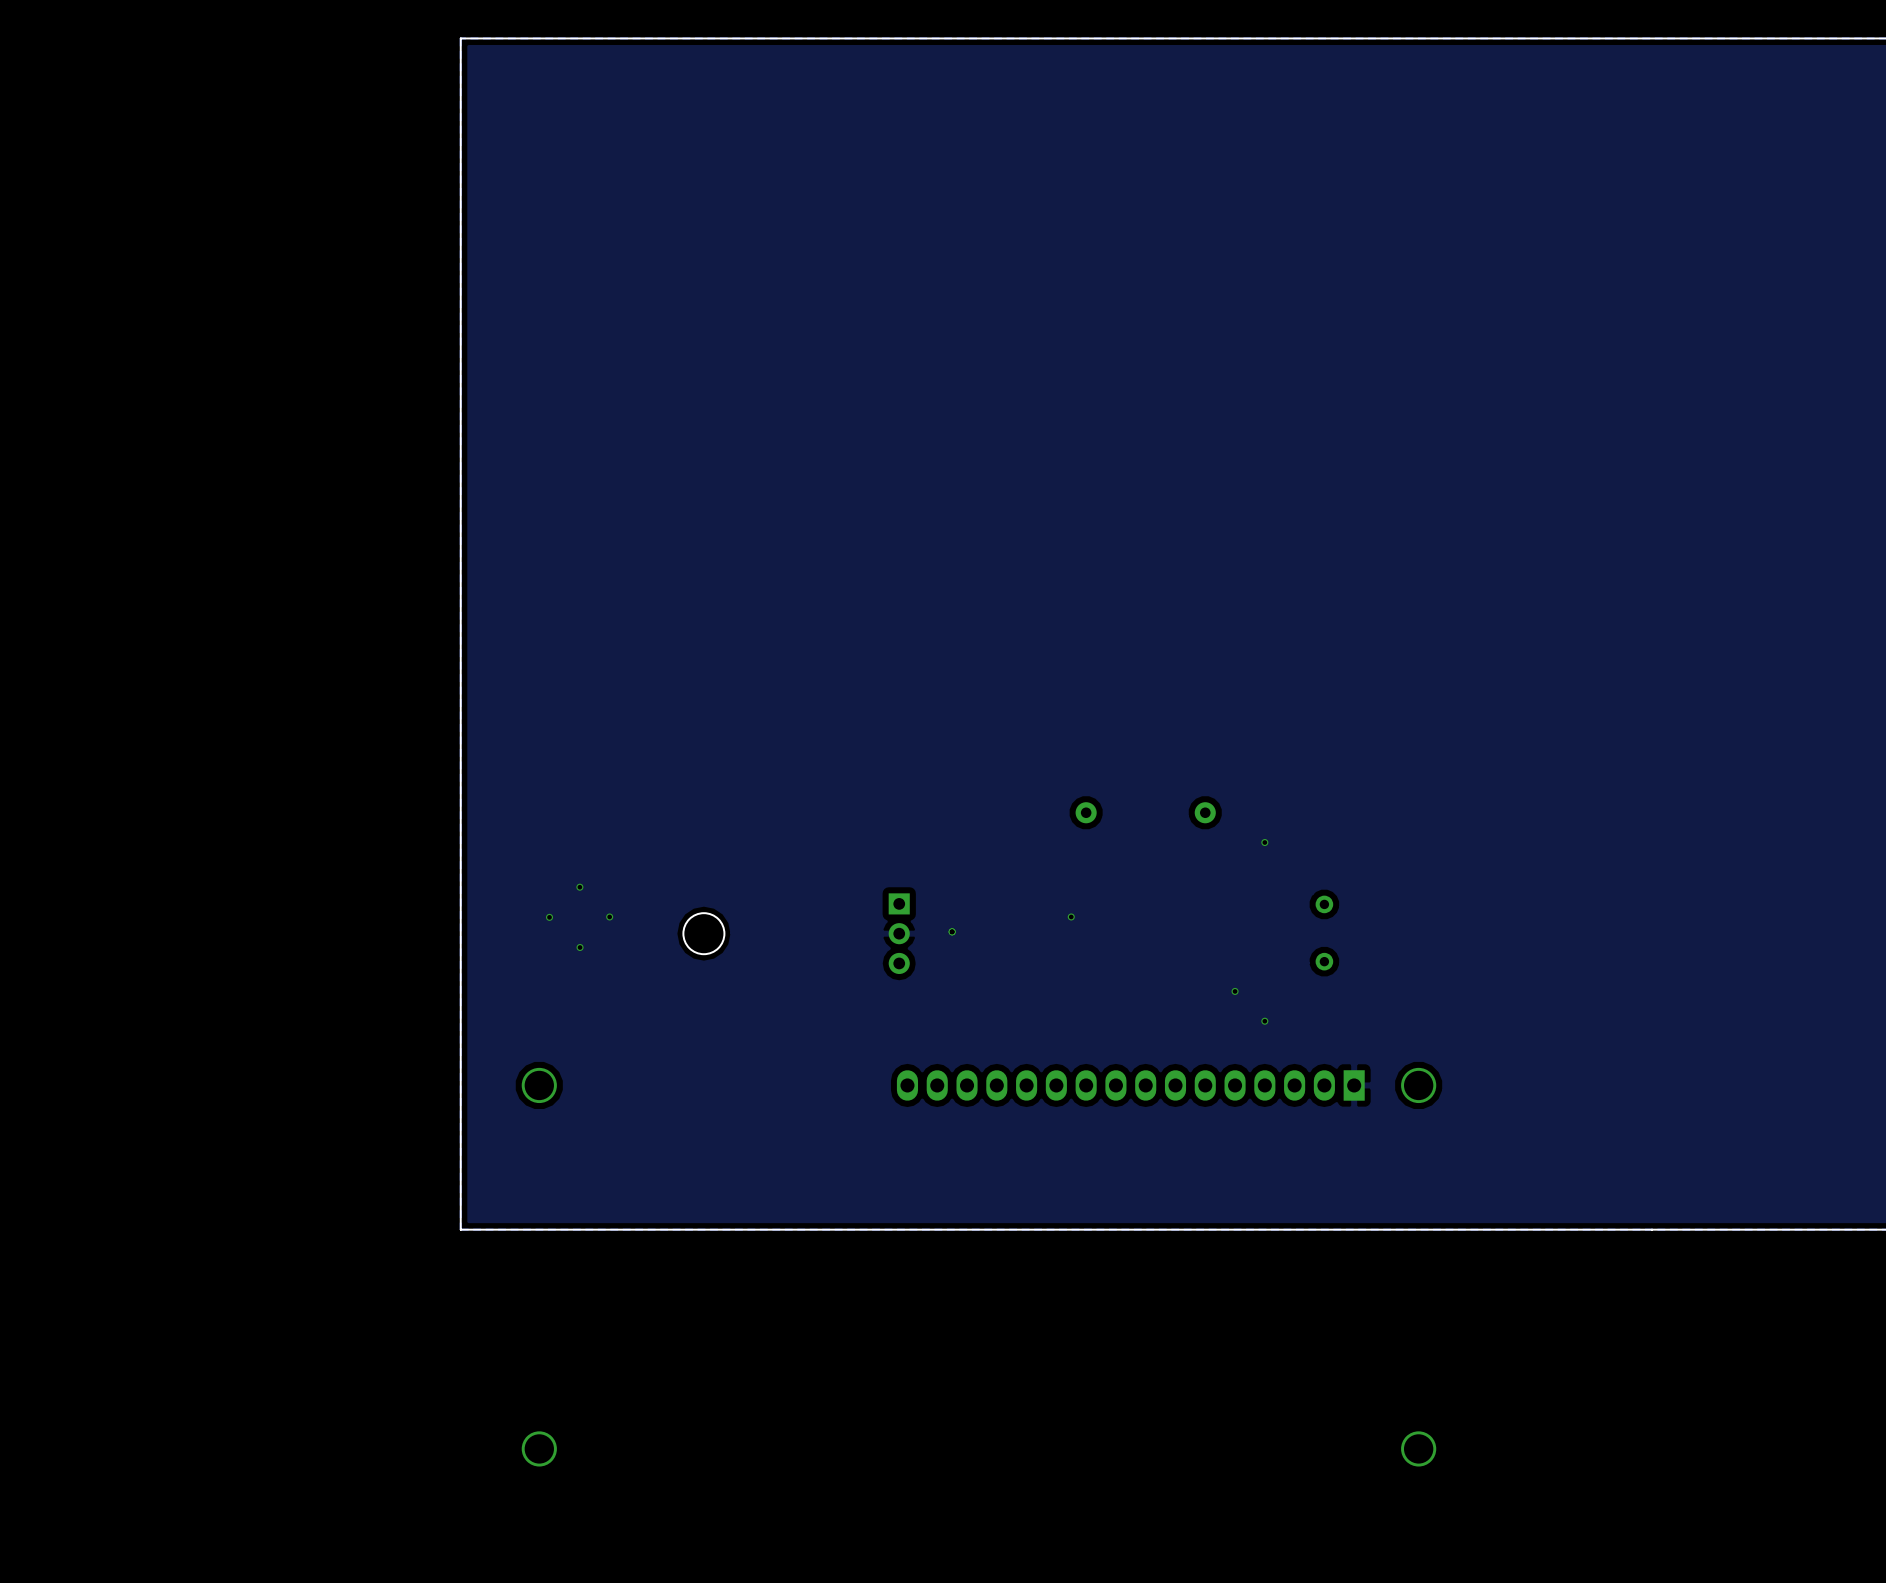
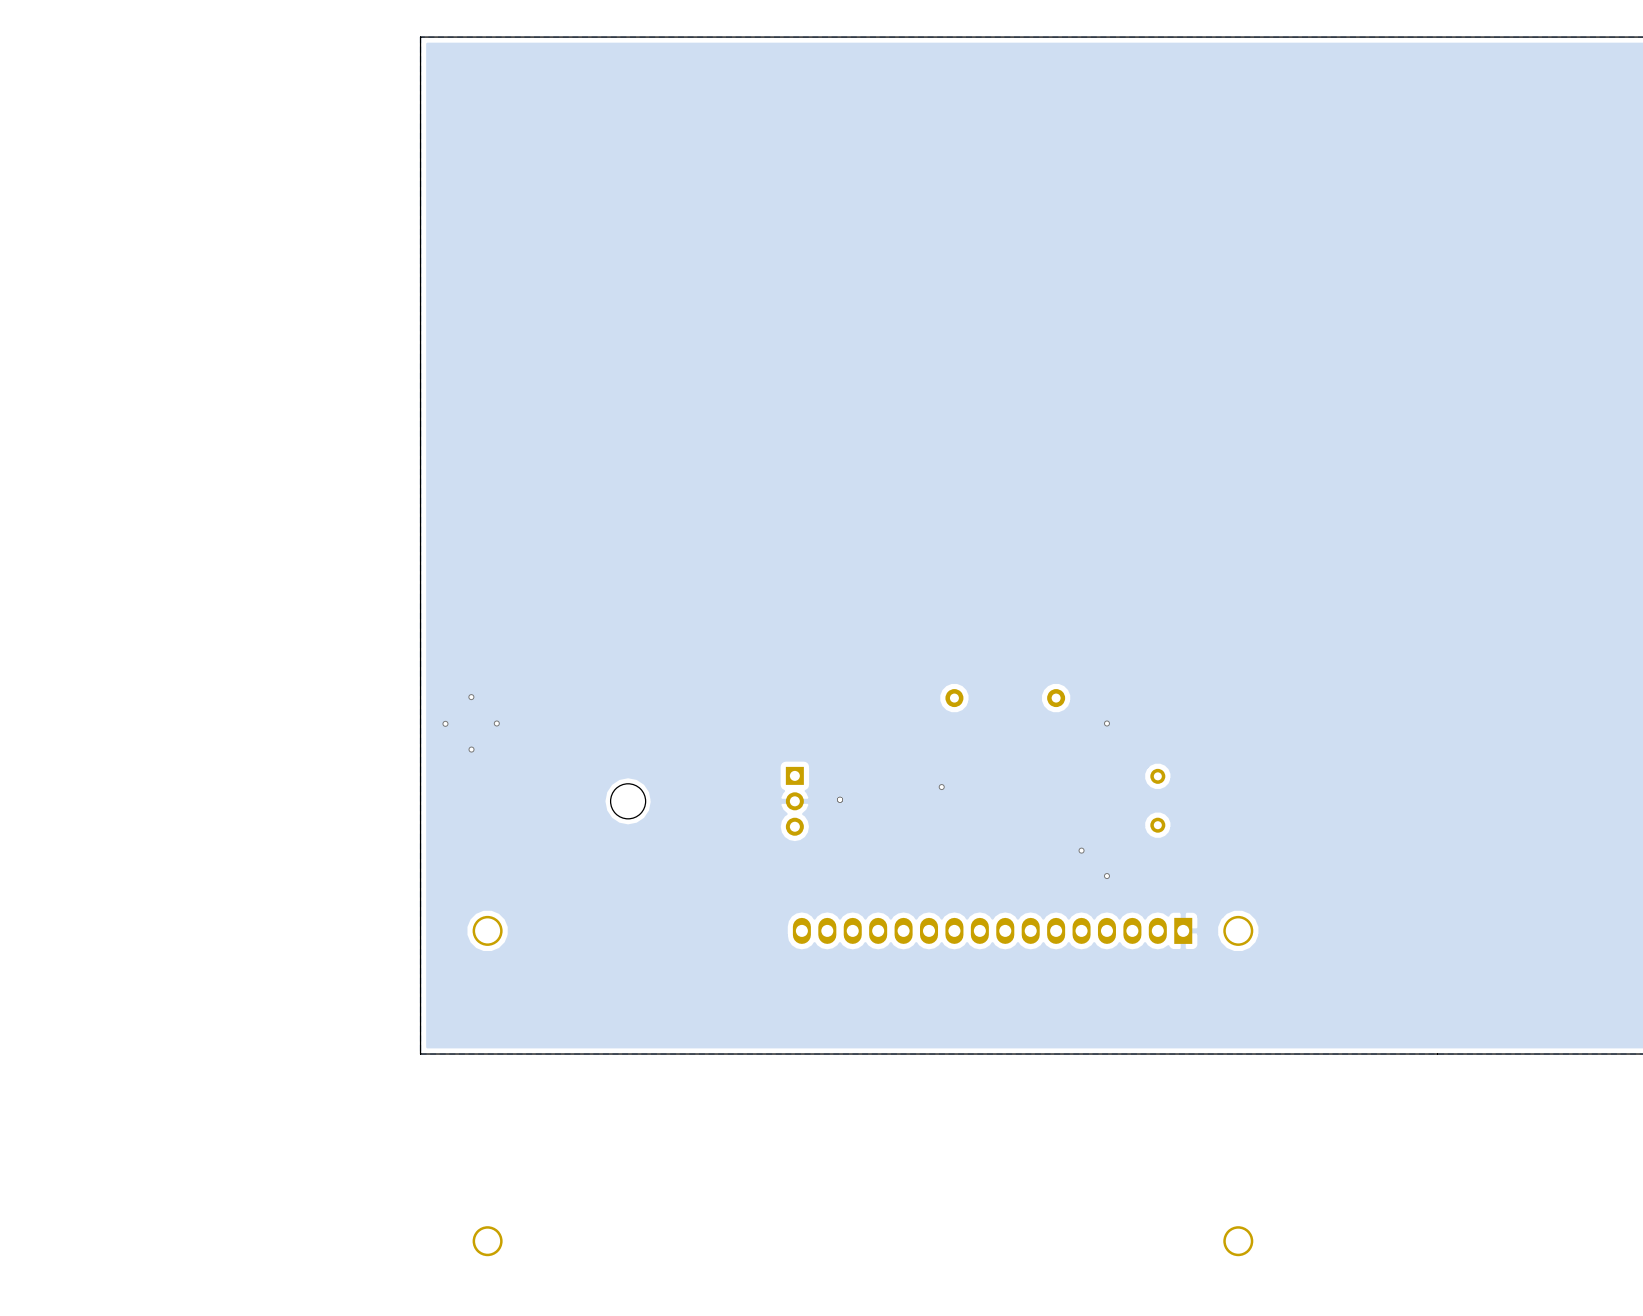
via: none -> (471, 697)
via: none -> (445, 723)
via: none -> (496, 723)
via: none -> (471, 749)
via: (579, 887) -> none
via: (609, 916) -> none
via: (549, 917) -> none
via: (580, 947) -> none

